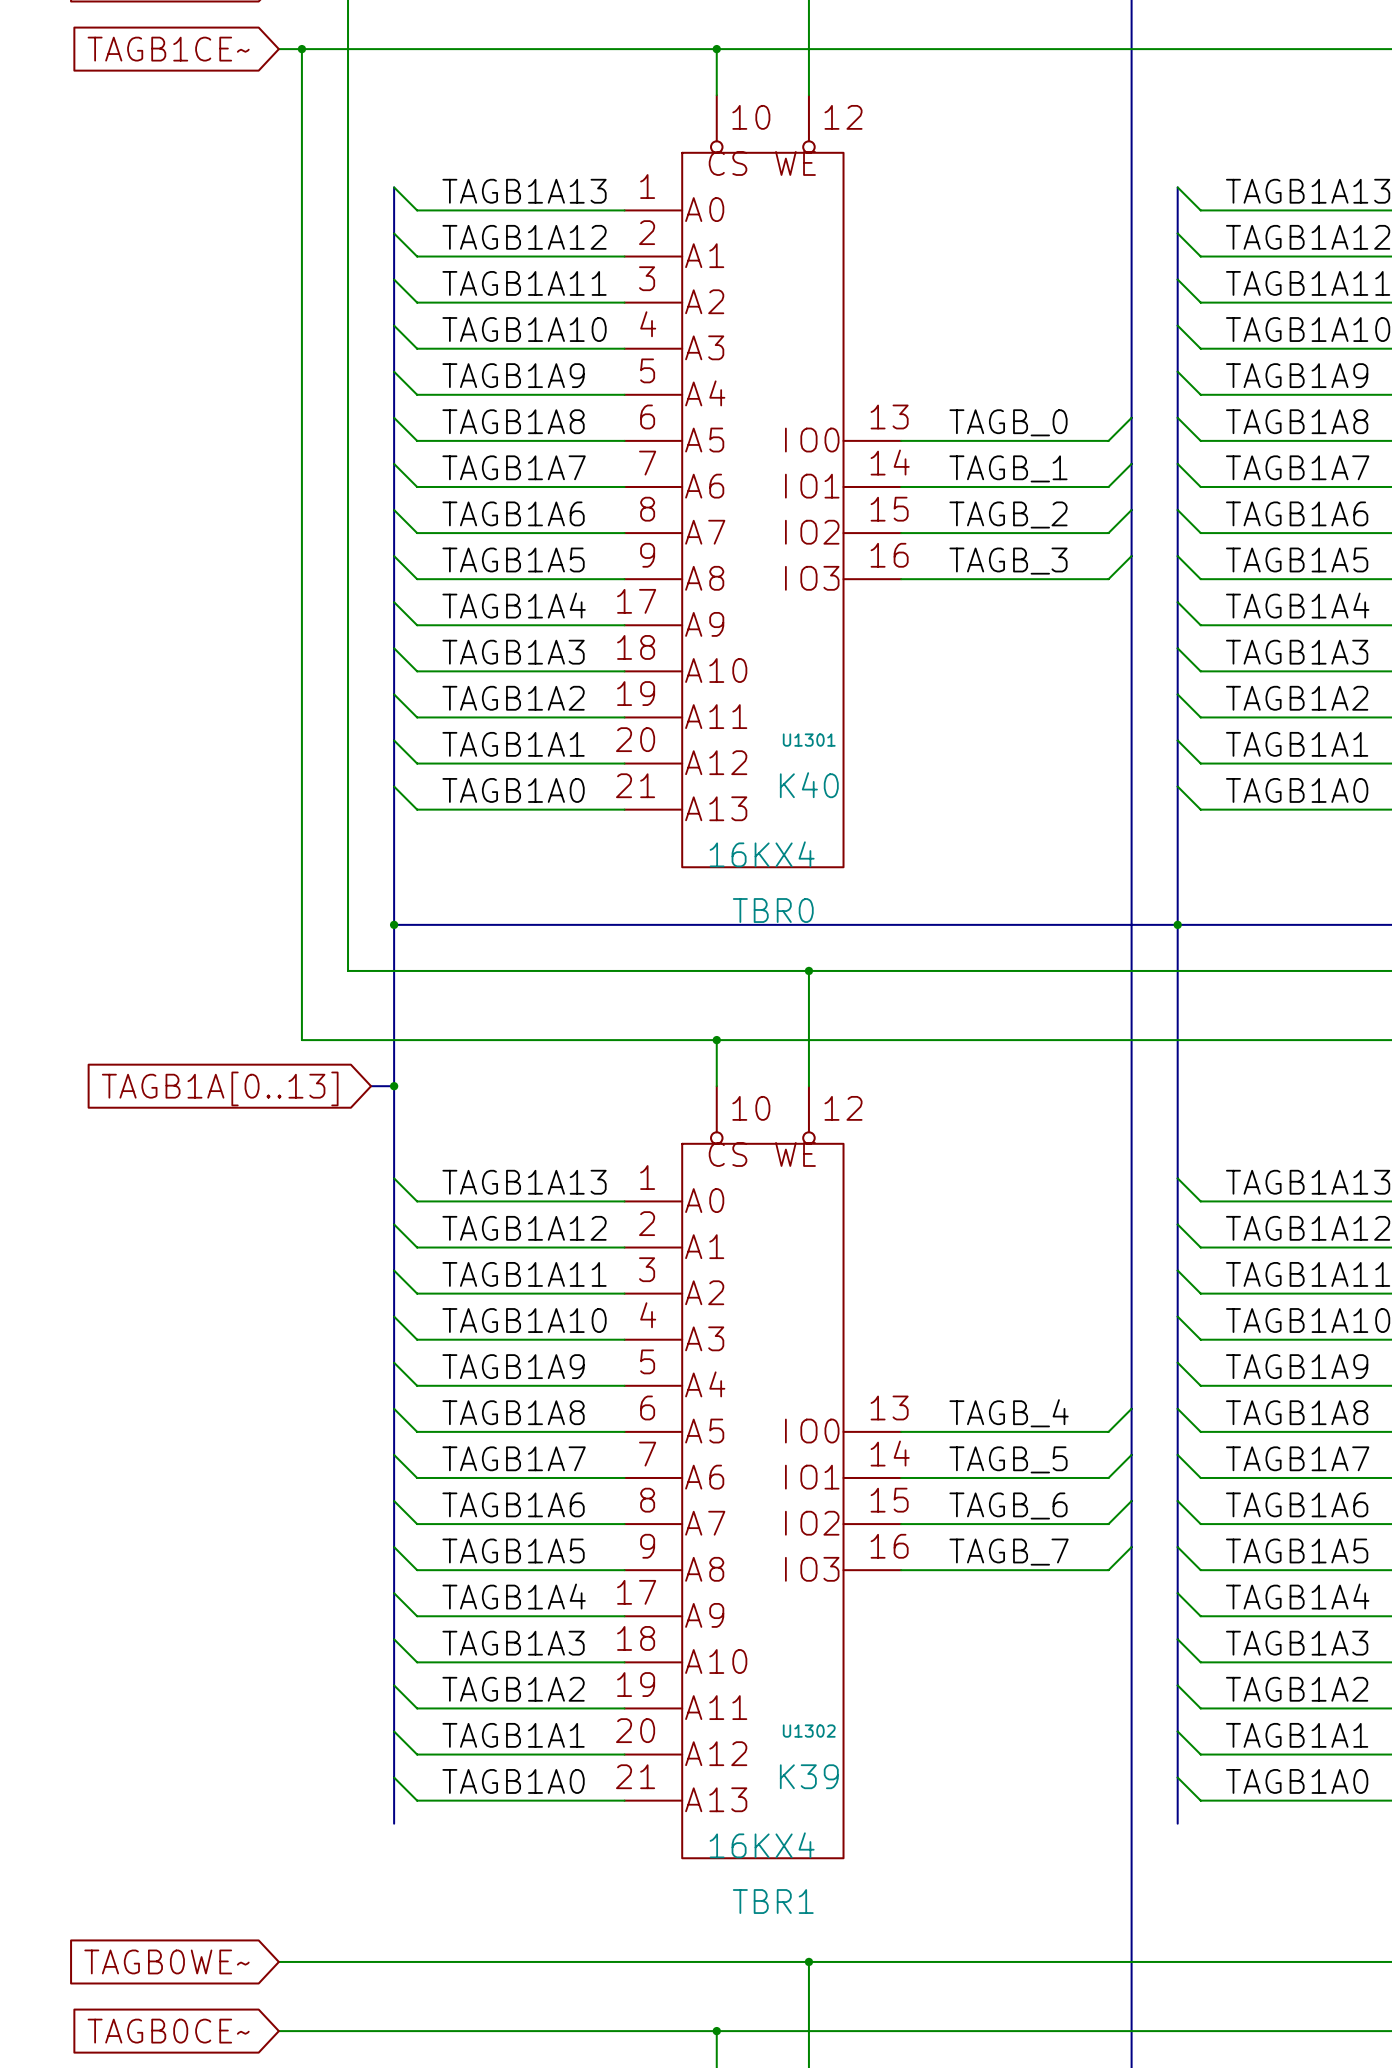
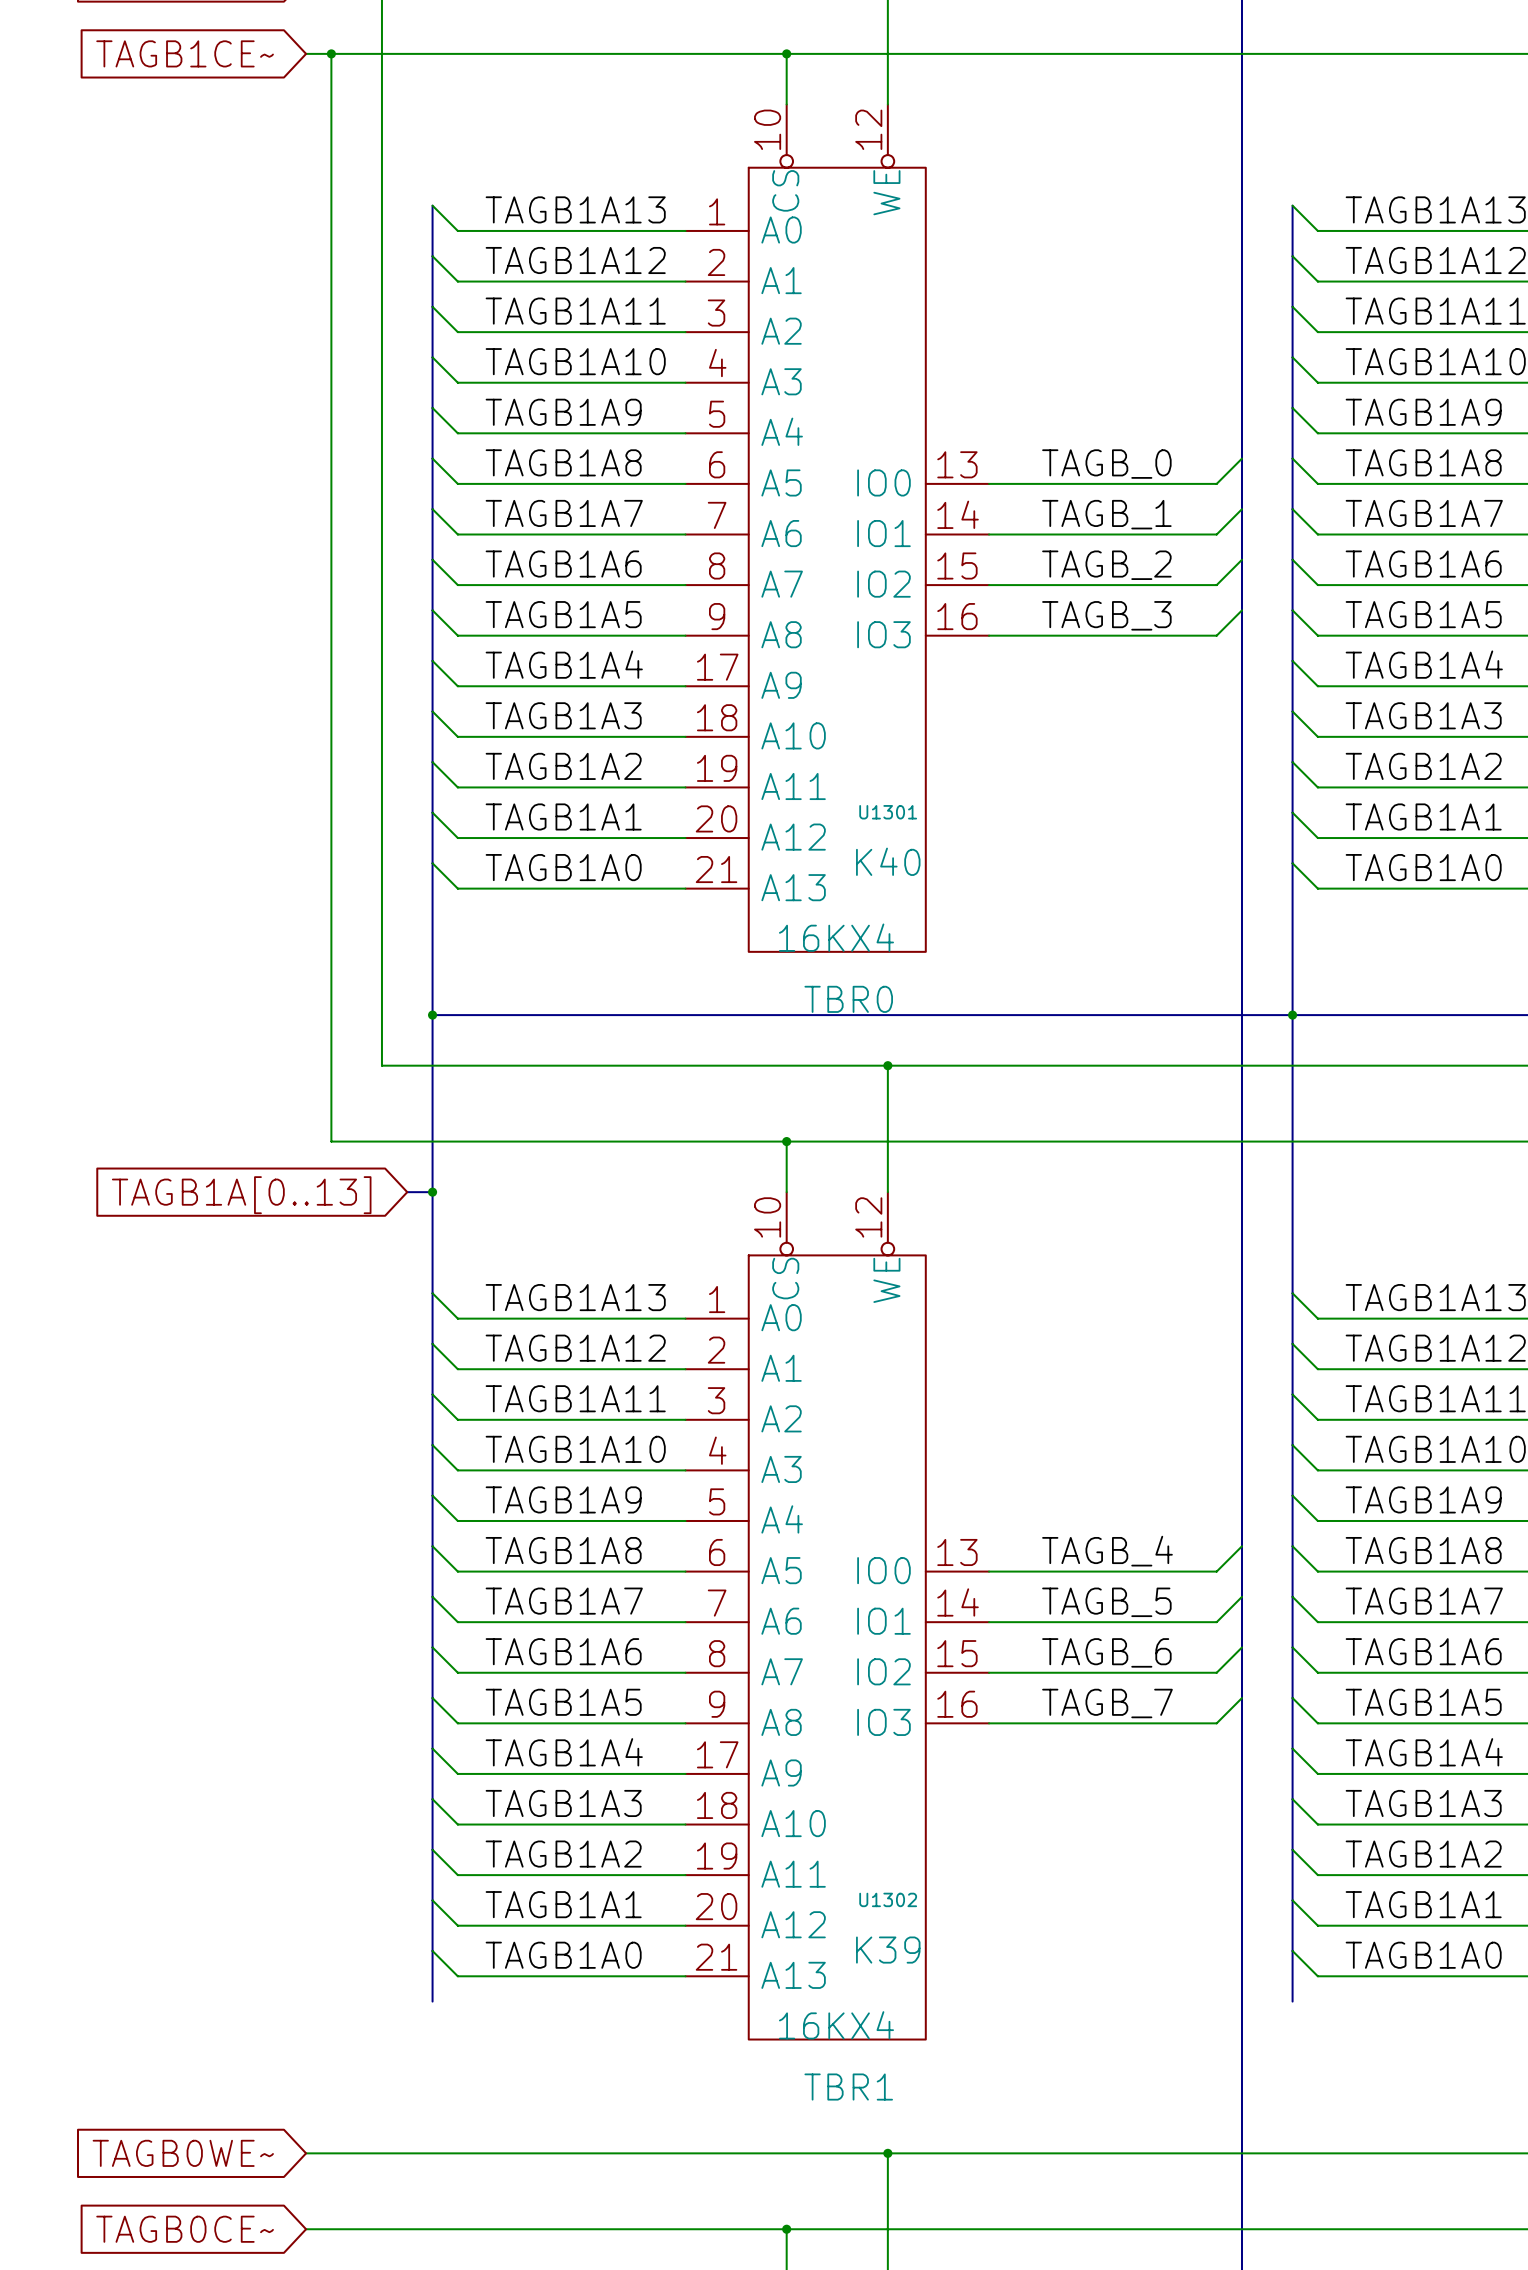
U1301 symbol: [624, 95, 902, 868] -> [685, 104, 990, 952]
U1302 symbol: [624, 1086, 902, 1859] -> [685, 1192, 990, 2040]

